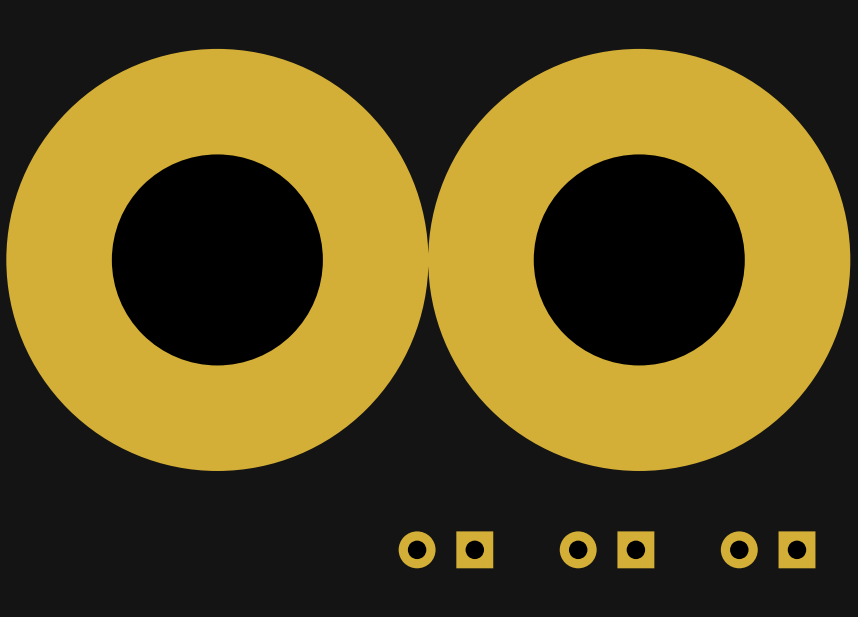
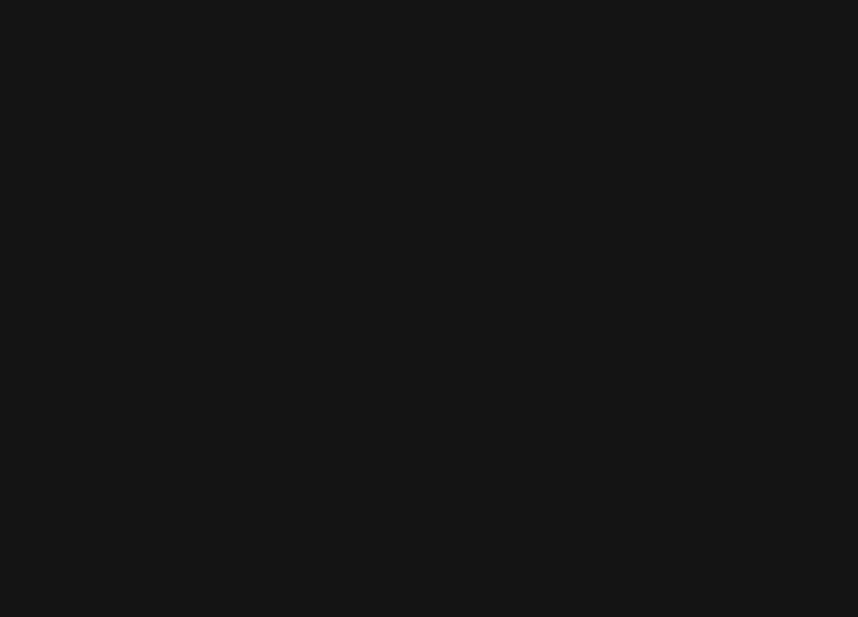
part: (217, 259) -> none
part: (639, 259) -> none
part: (445, 549) -> none
part: (607, 549) -> none
part: (768, 549) -> none

